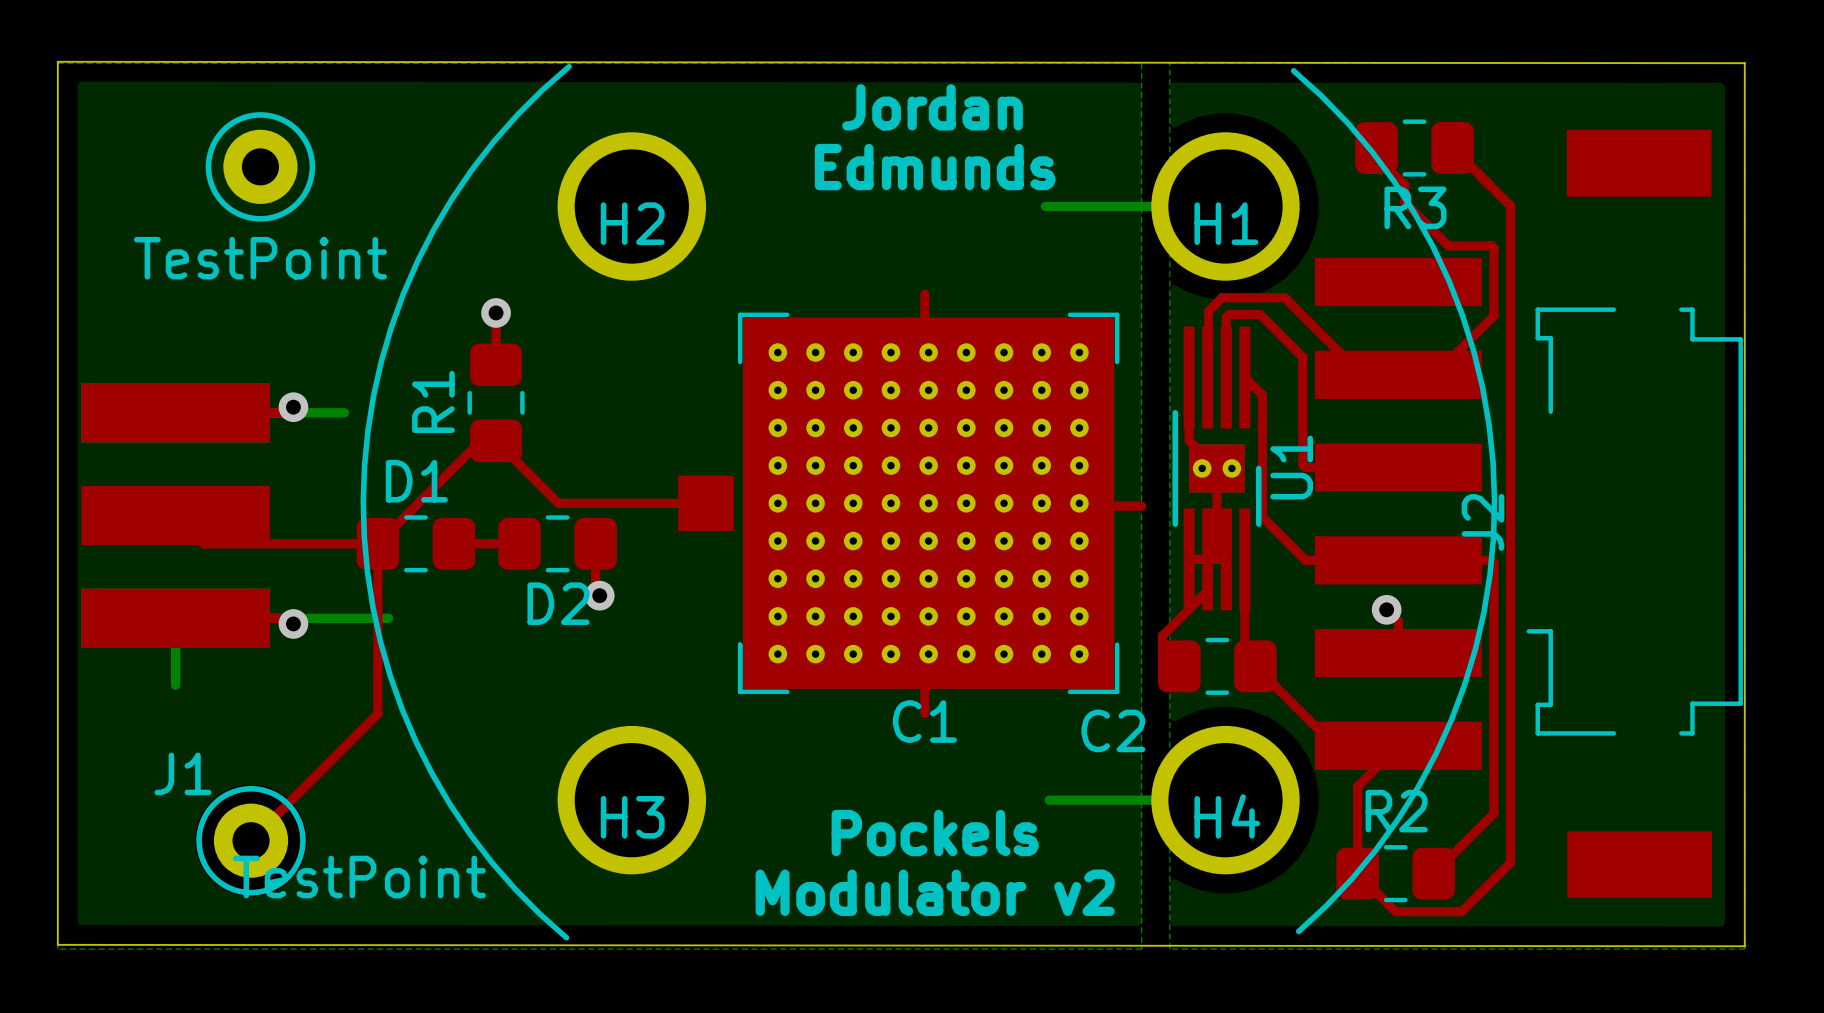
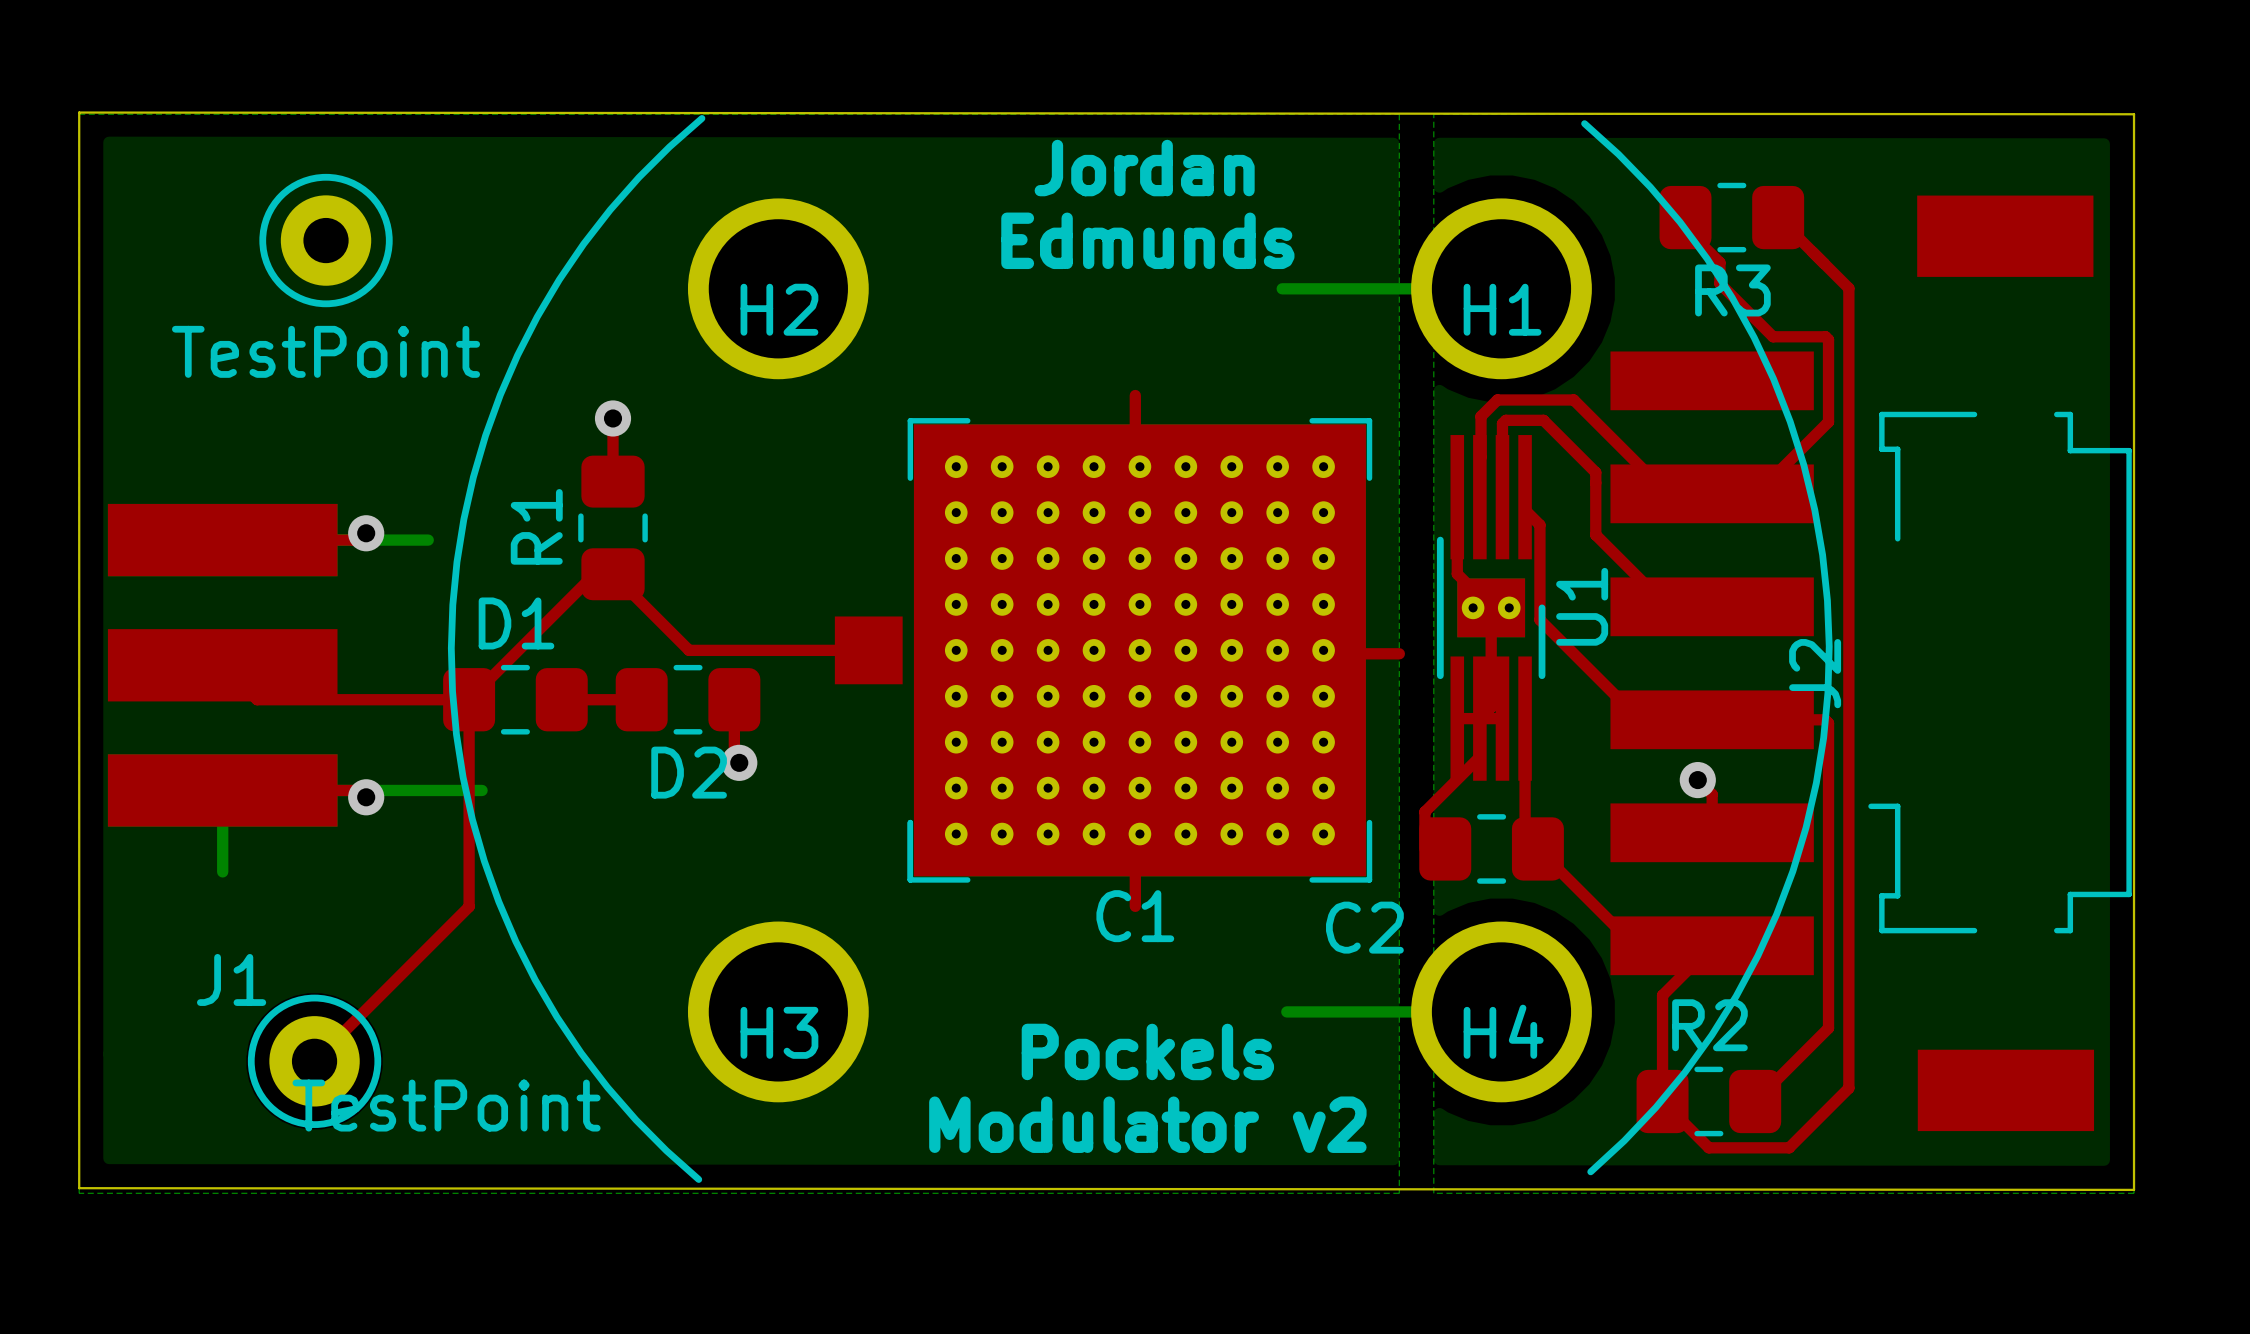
top track: (1244, 377) (1262, 395) (1262, 517) (1305, 560) (1339, 560) -> (1525, 510) (1539, 525) (1539, 619) (1639, 719)
top track: (1302, 408) (1302, 464) (1305, 467) (1361, 467) -> (1595, 534) (1667, 606)

